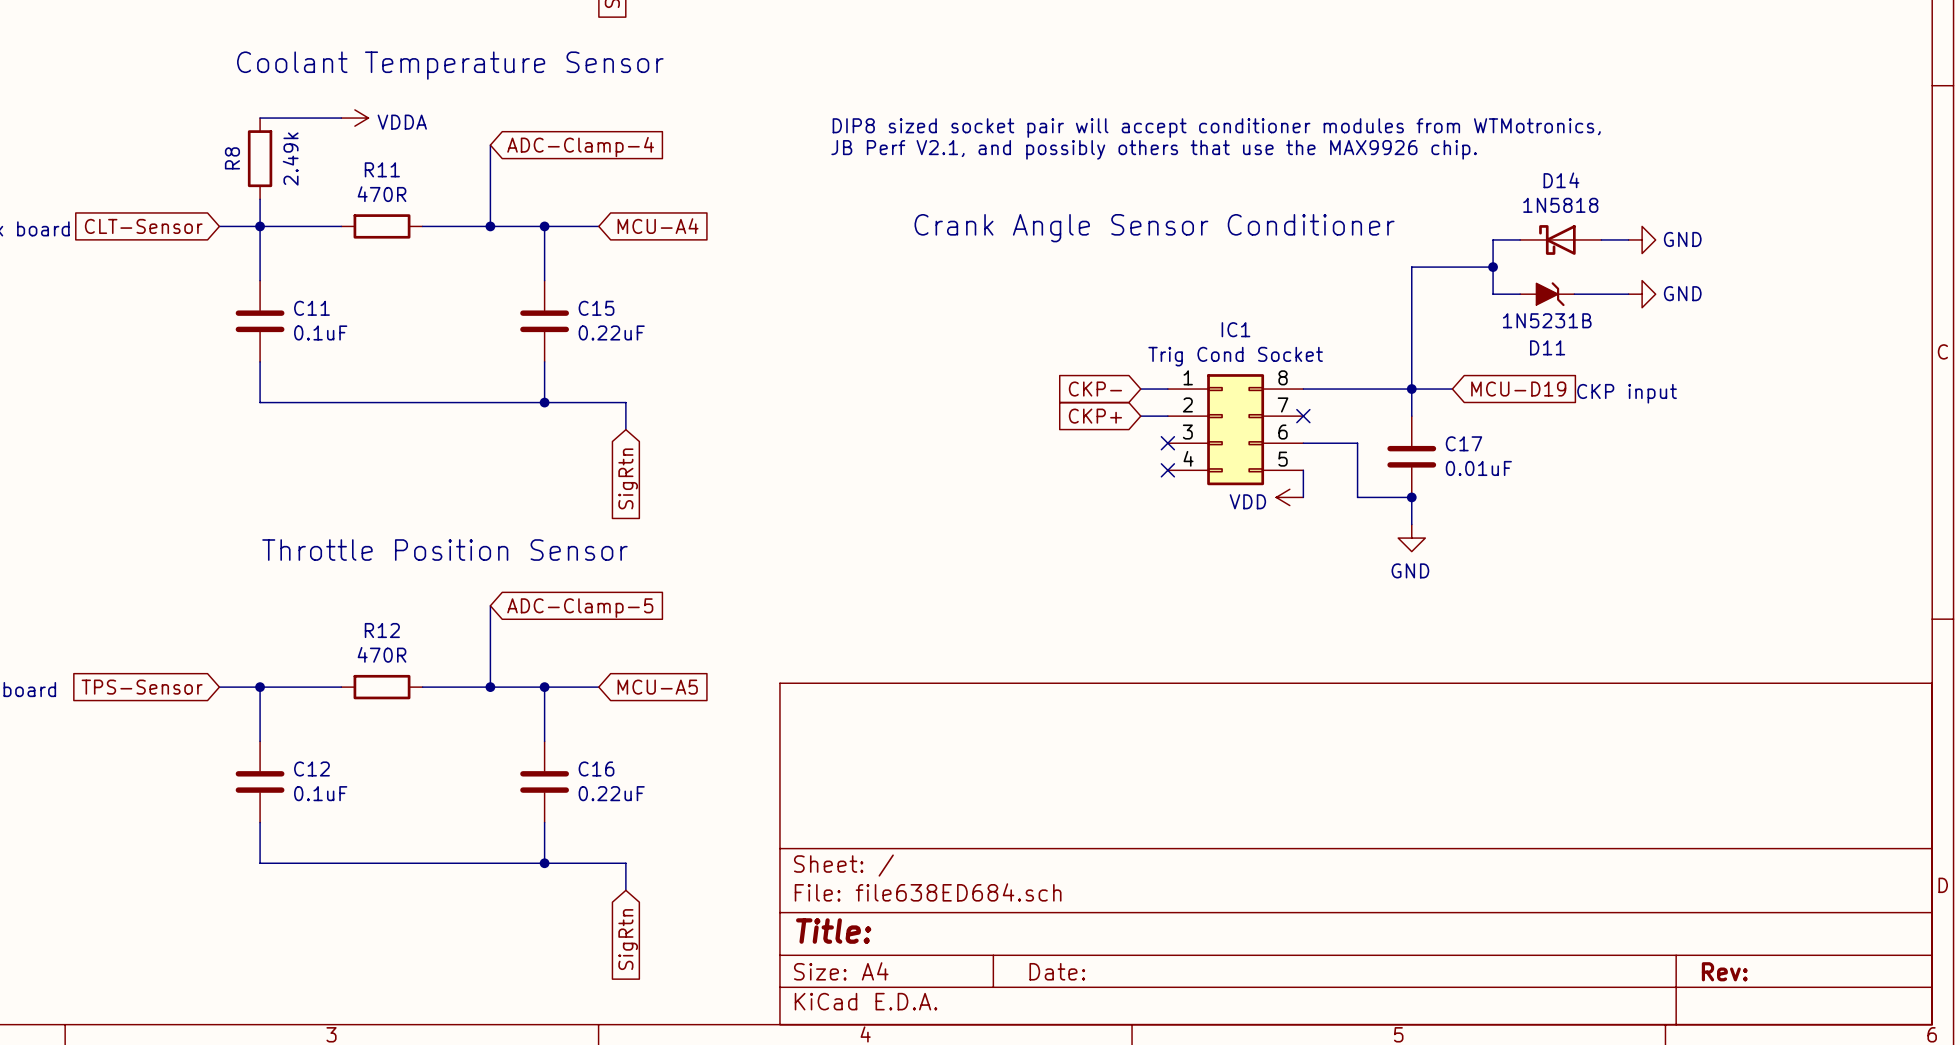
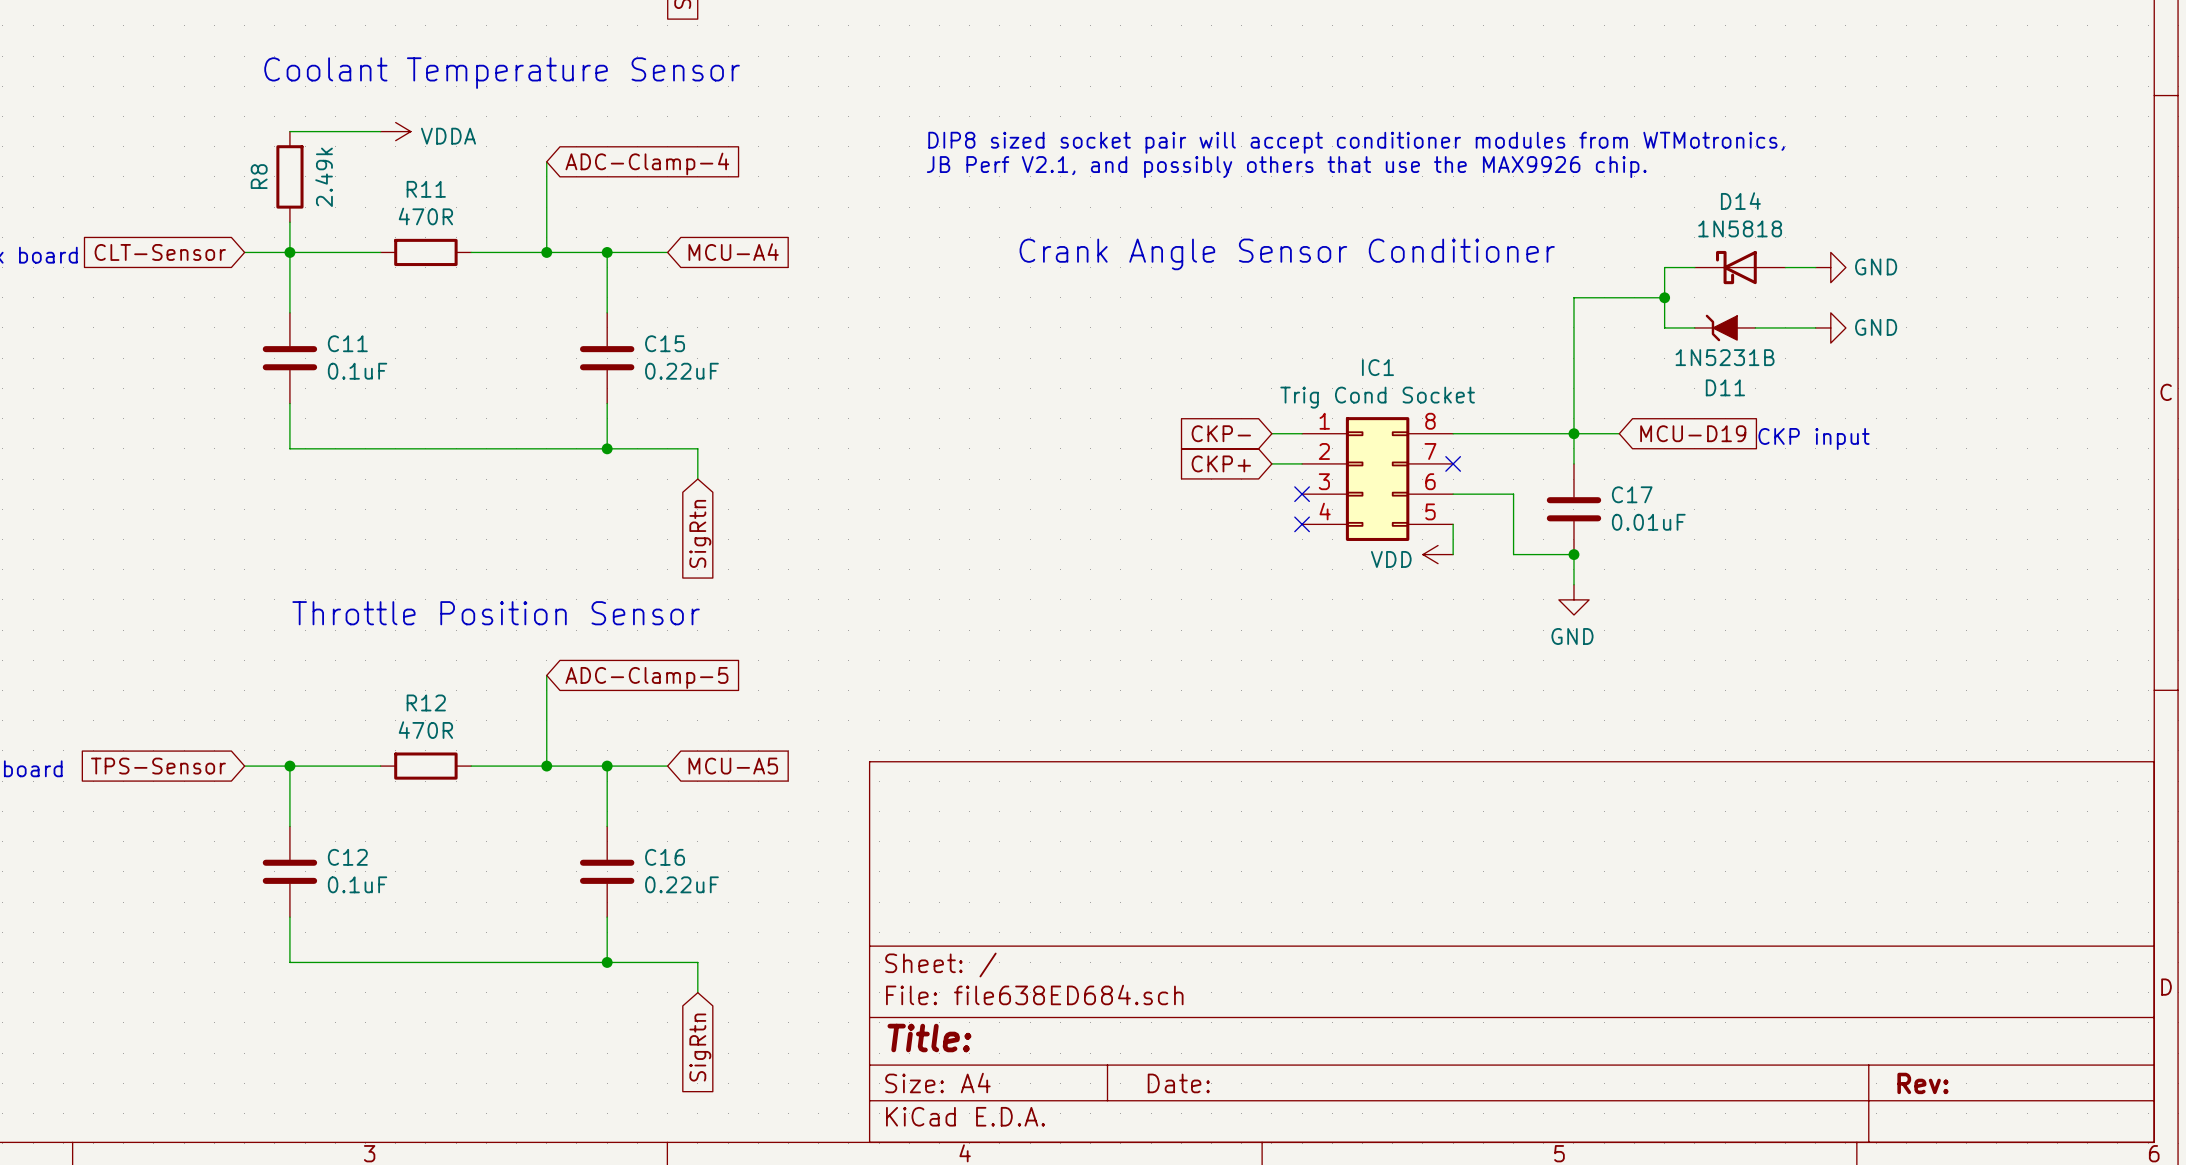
D11 rotation: 0° (1550, 294) -> 180° (1721, 327)

